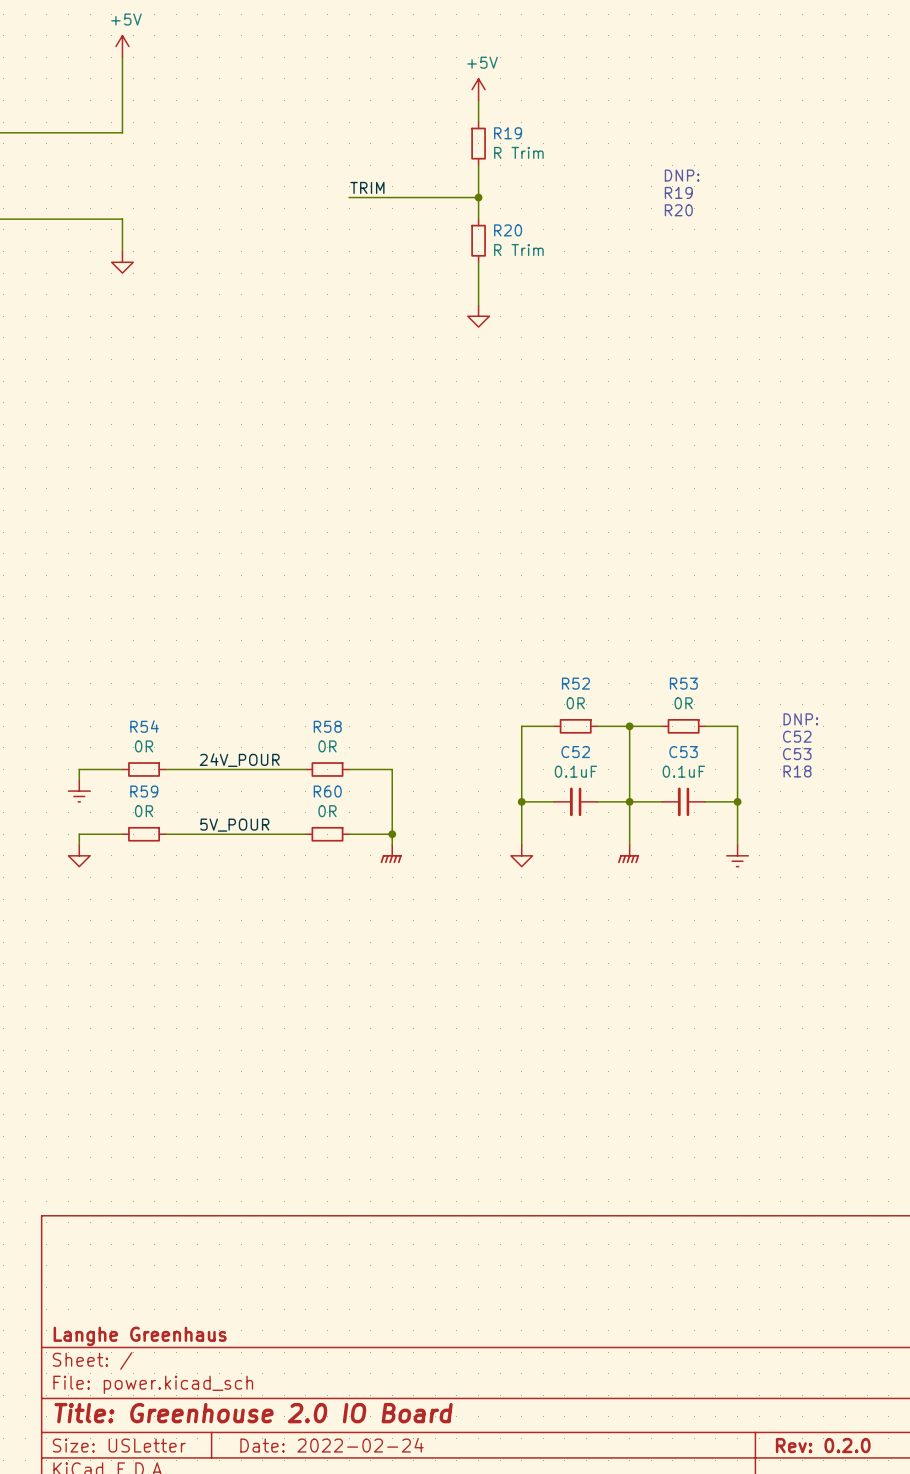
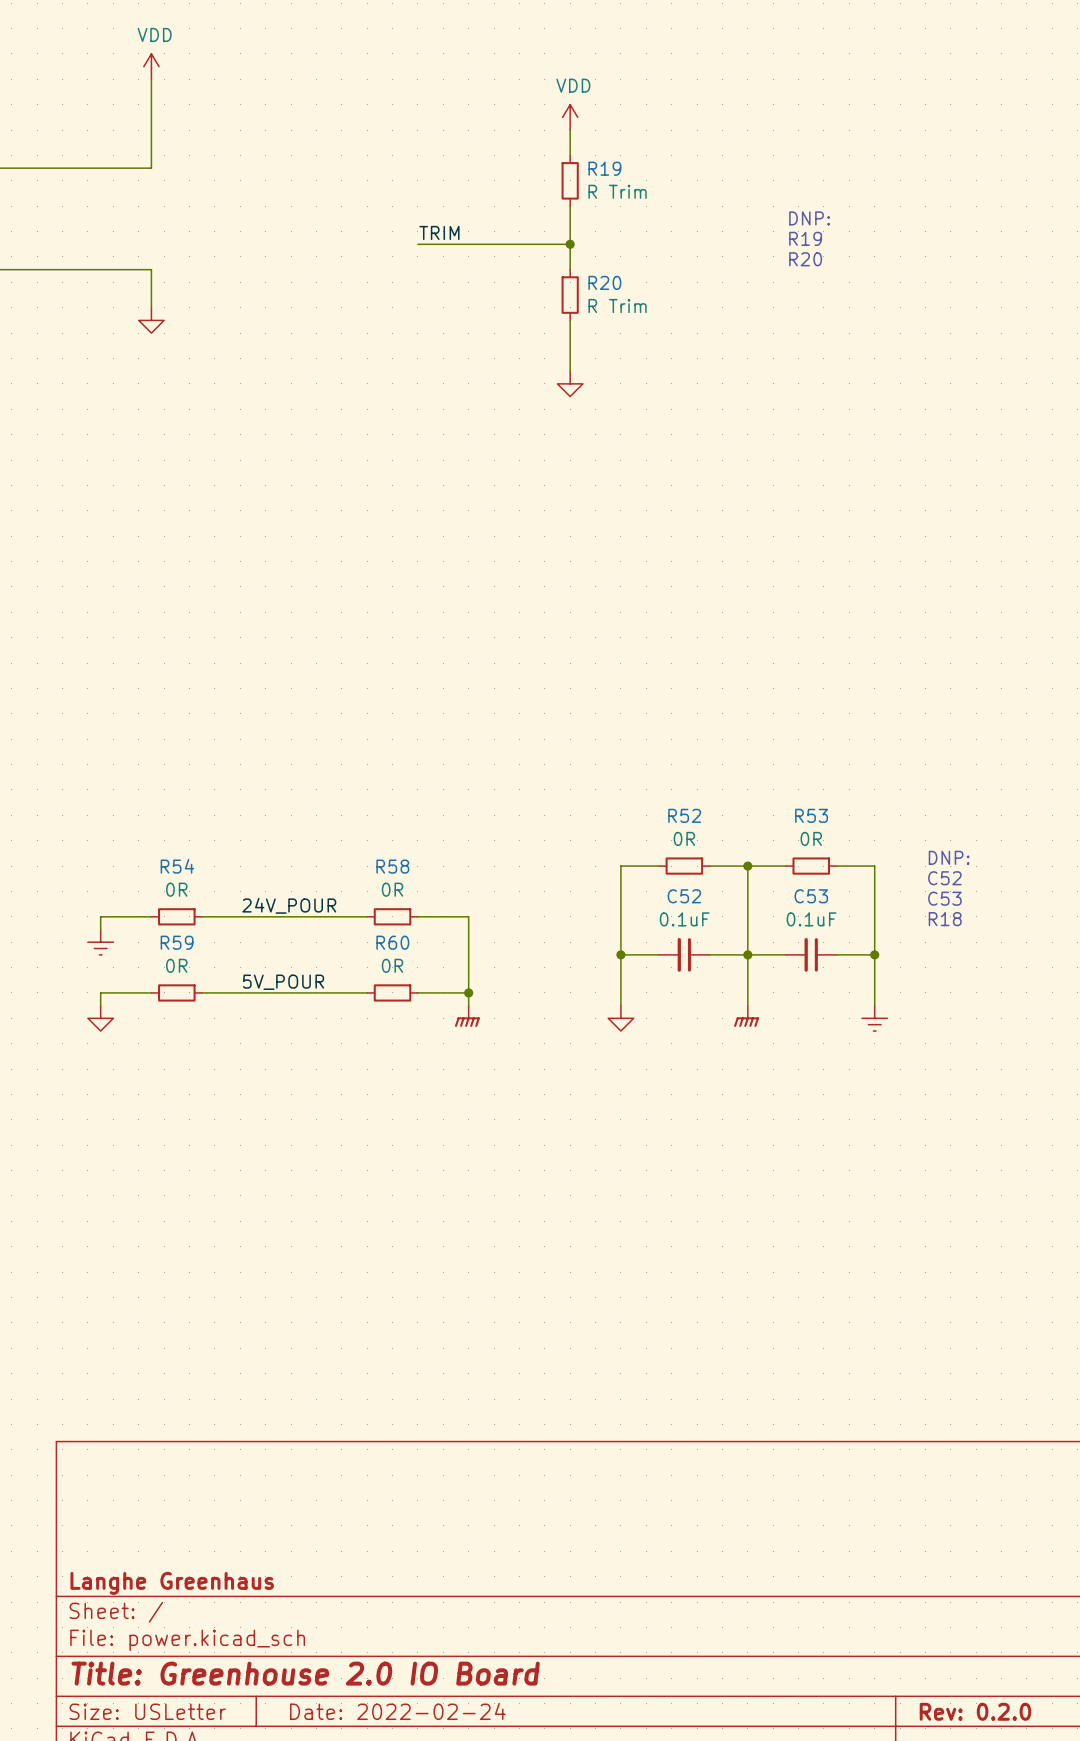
power symbol: +5V (122, 46) -> VDD (151, 66)
power symbol: +5V (478, 89) -> VDD (570, 117)

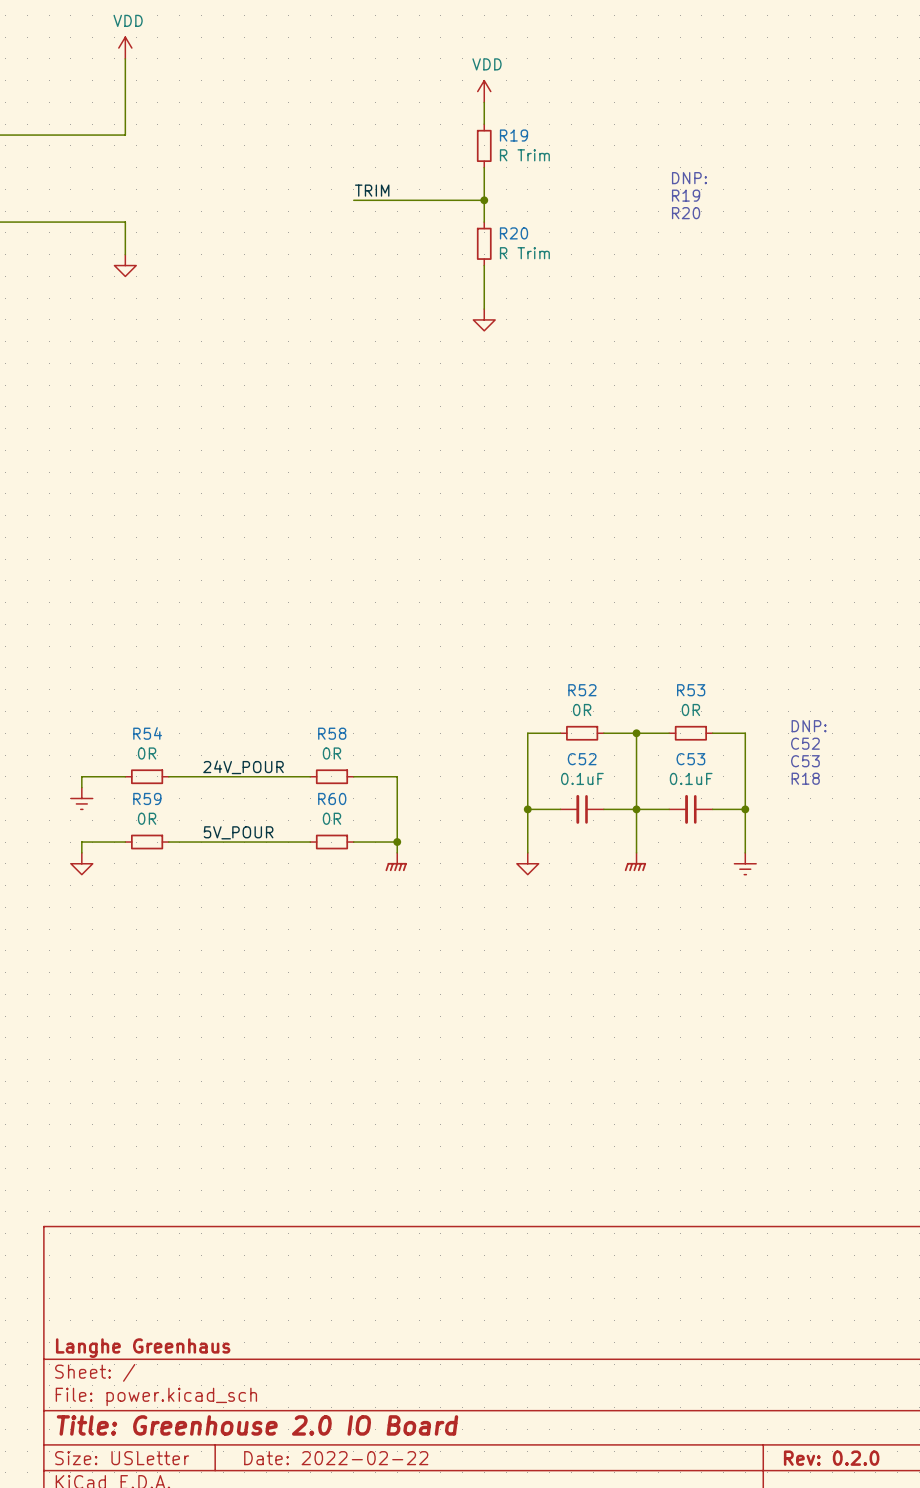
title block: Date: 2022-02-24 (397, 1711) -> Date: 2022-02-22 (336, 1458)

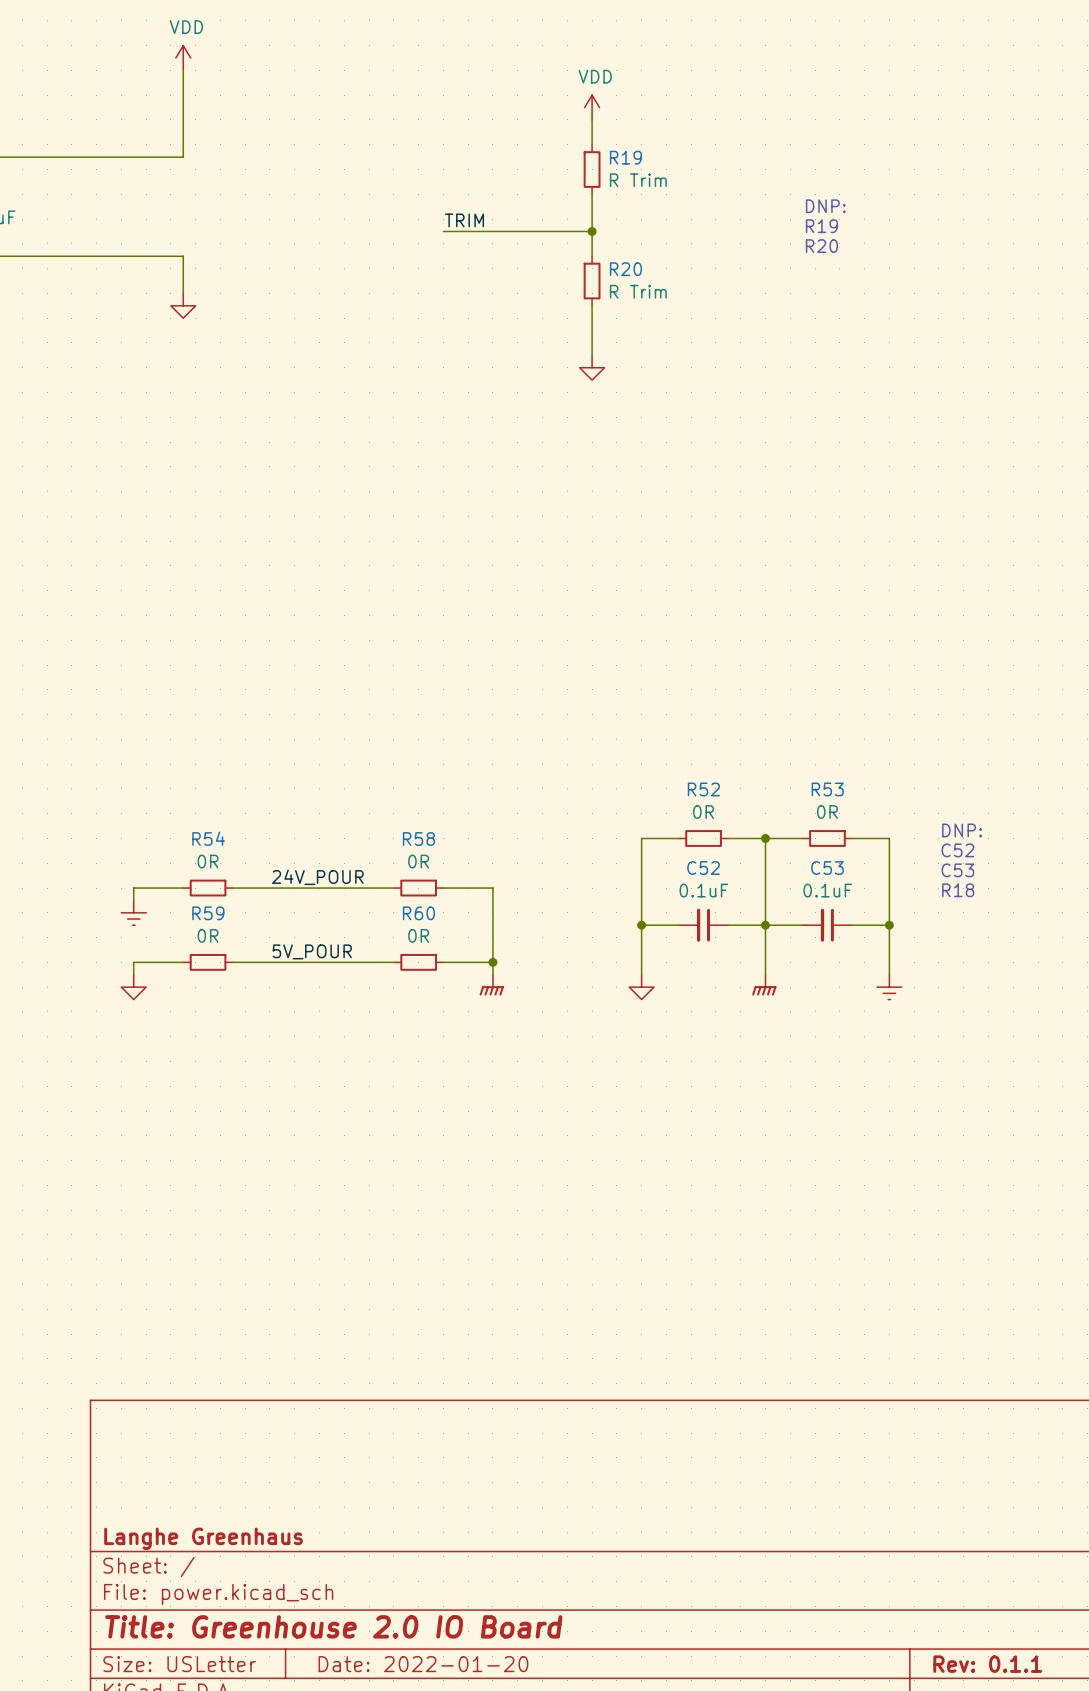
title block: Date: 2022-02-22 (336, 1458) -> Date: 2022-01-20 (423, 1664)
title block: Rev: 0.2.0 (831, 1458) -> Rev: 0.1.1 (987, 1664)

